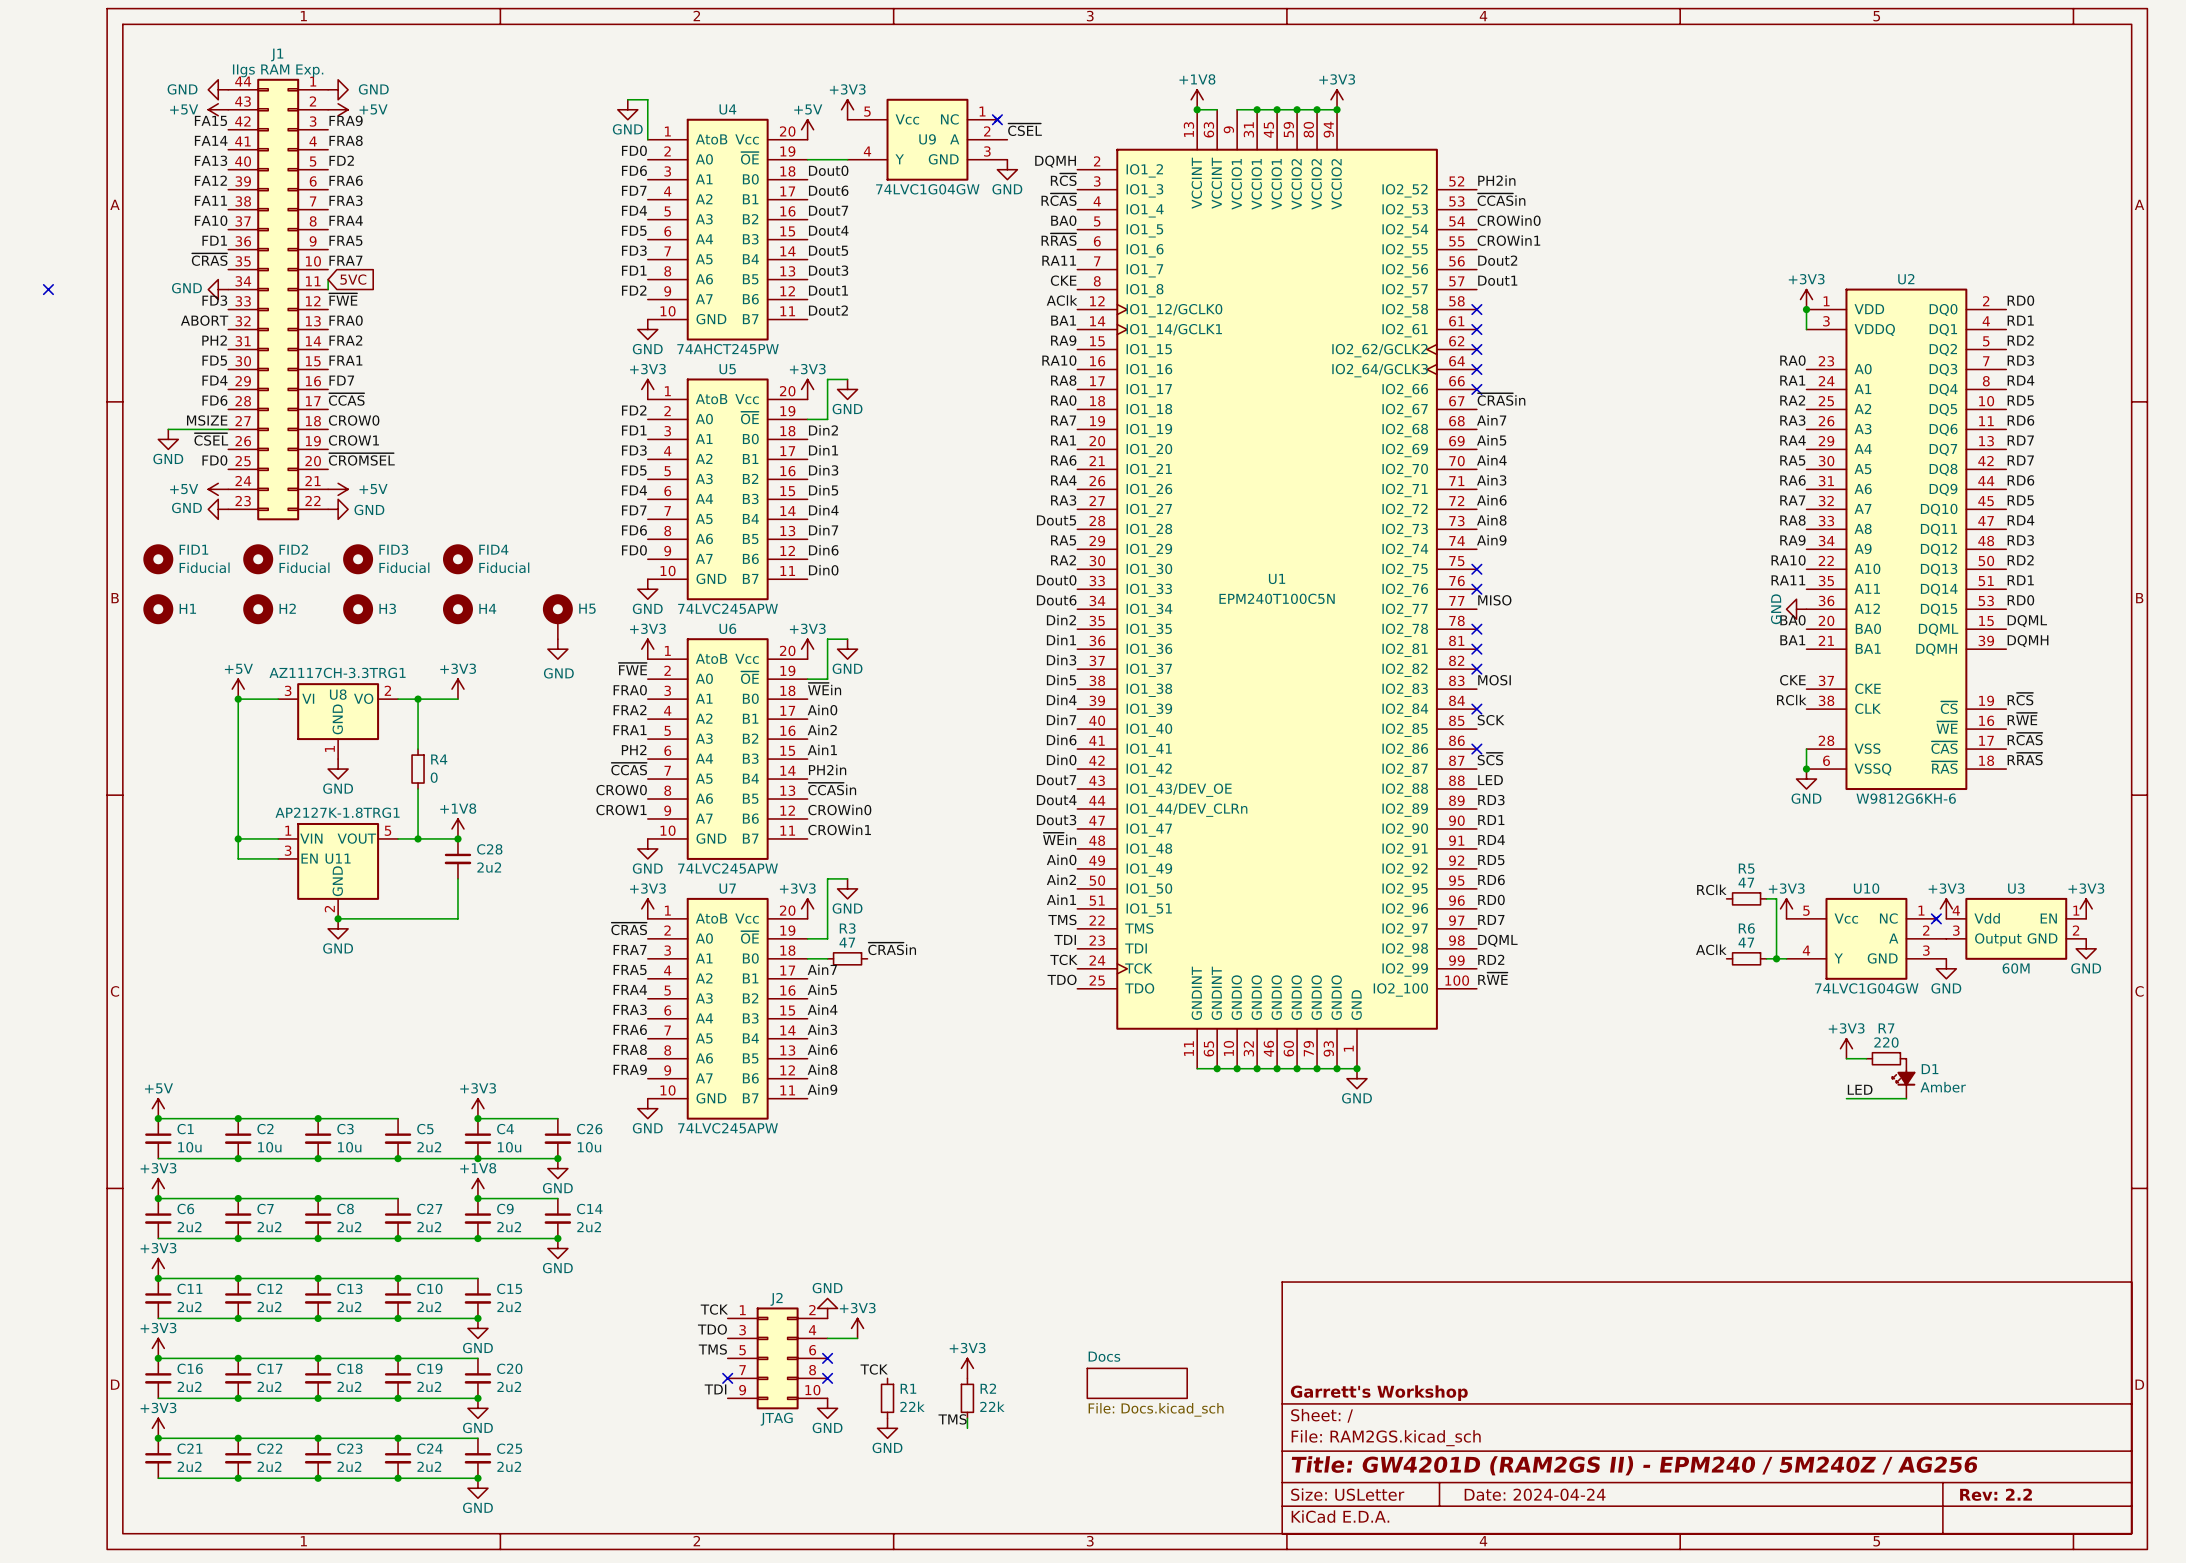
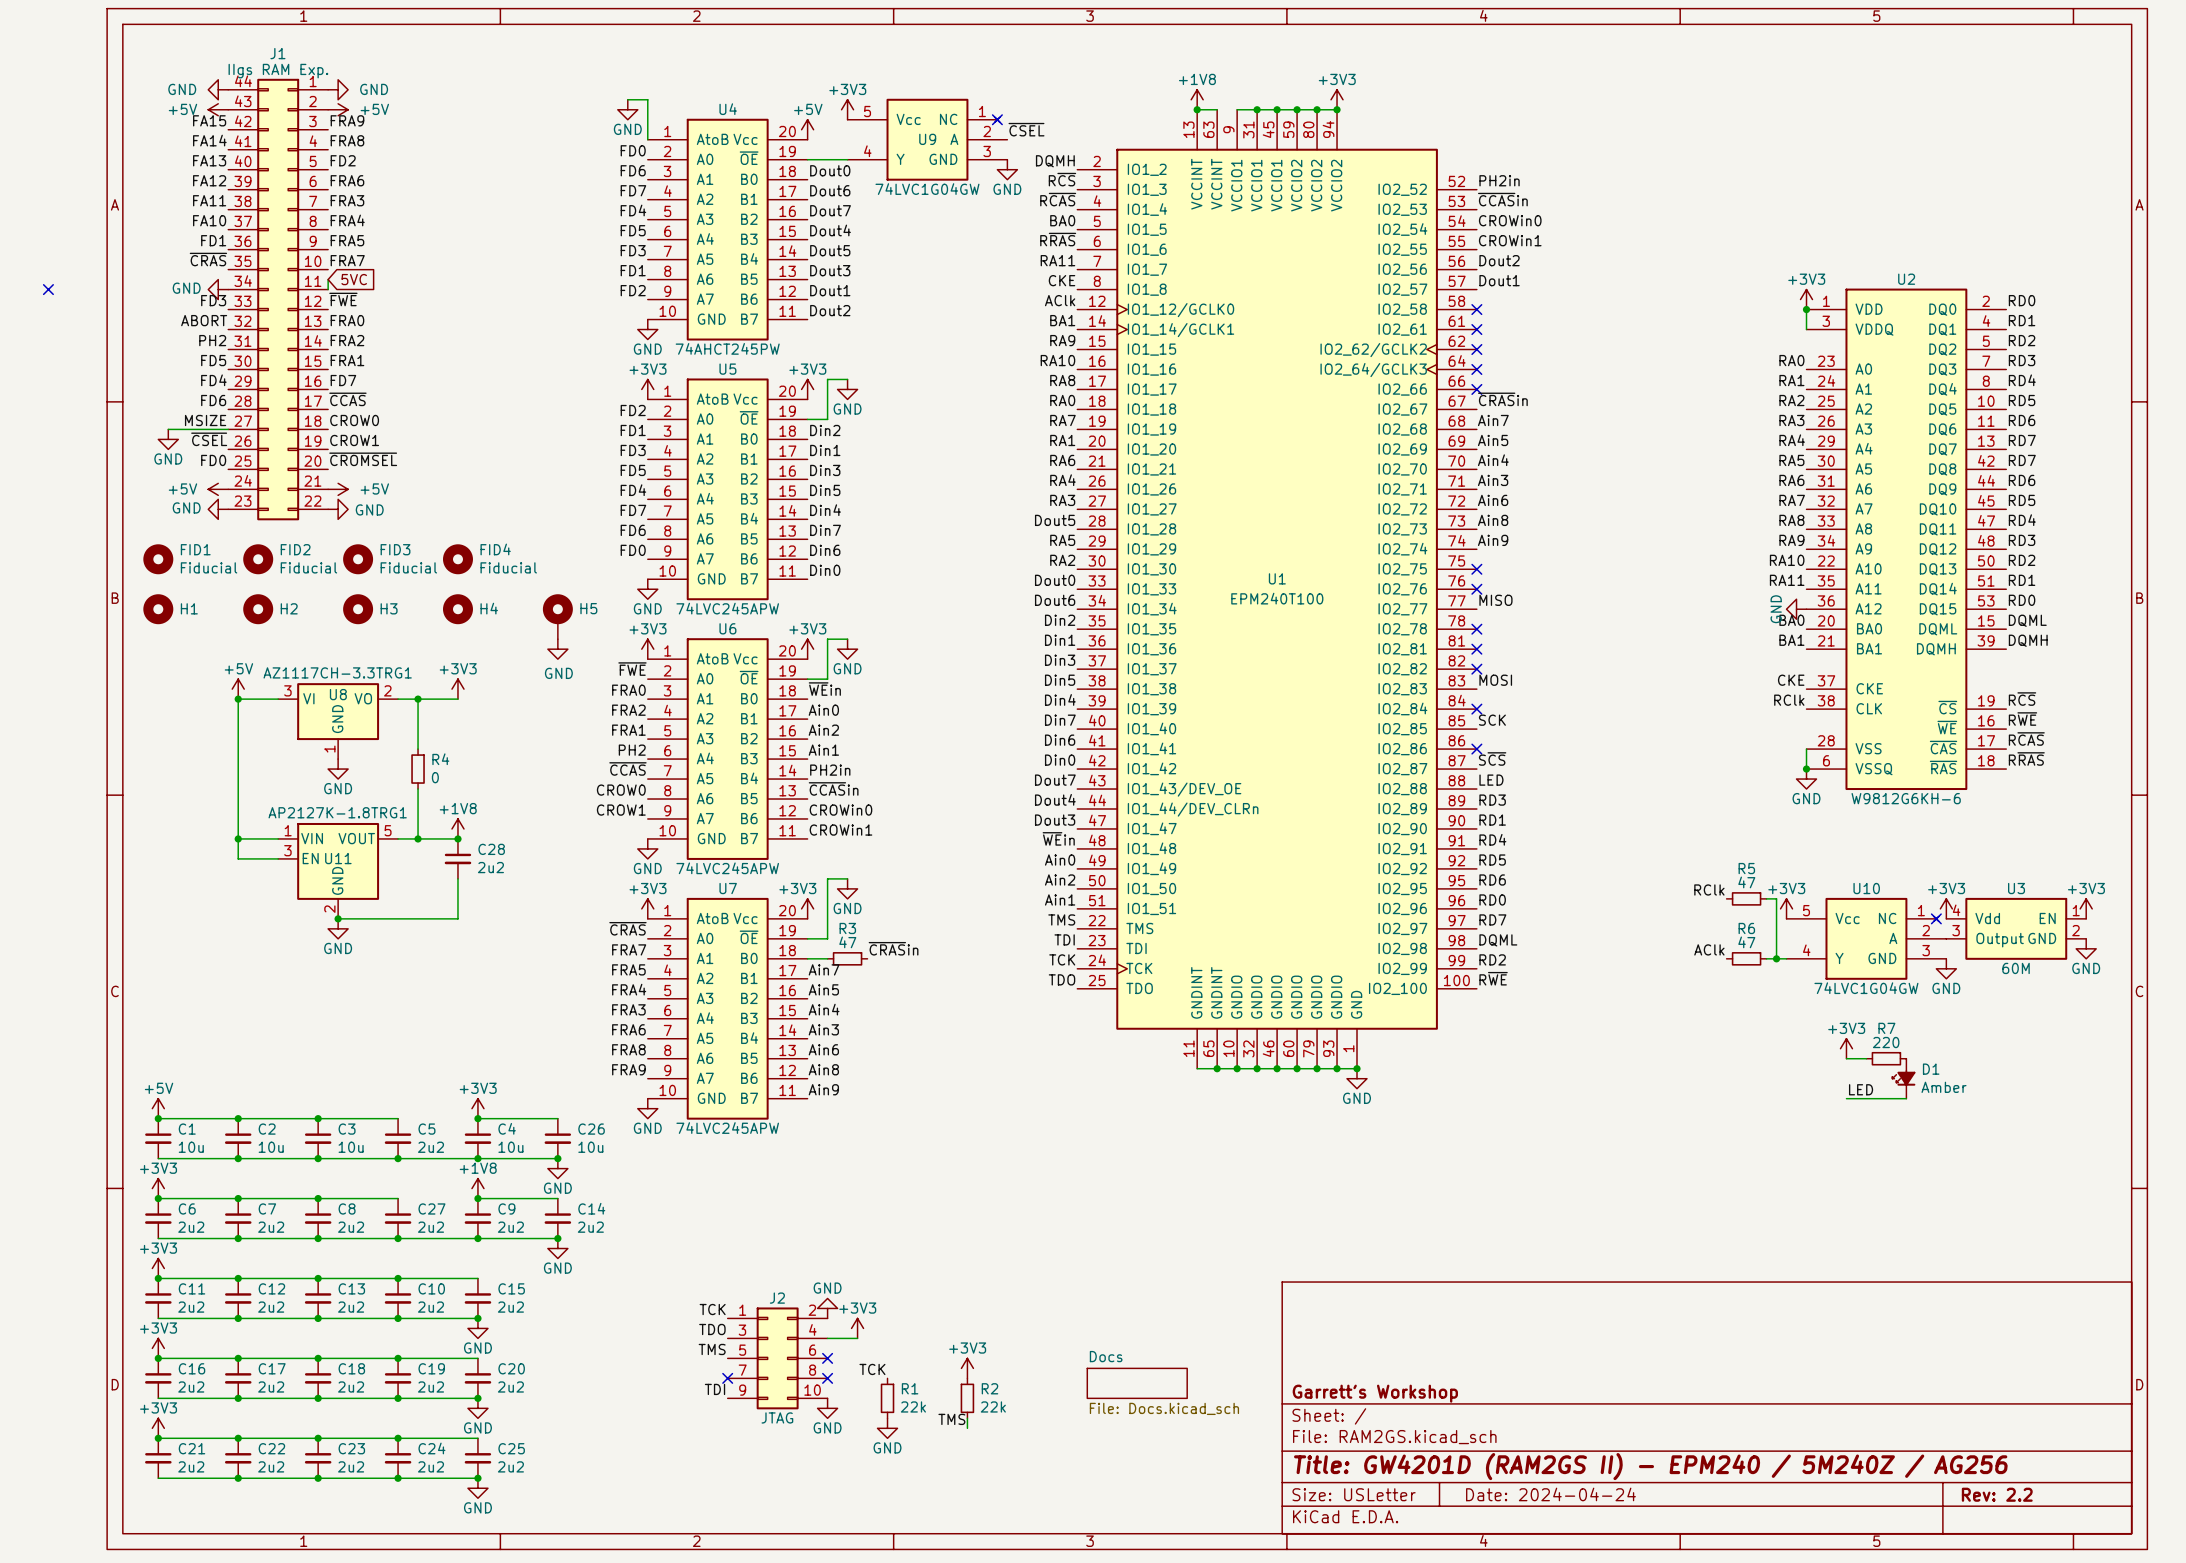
U1 value: EPM240T100C5N (1277, 598) -> EPM240T100 (1277, 598)

